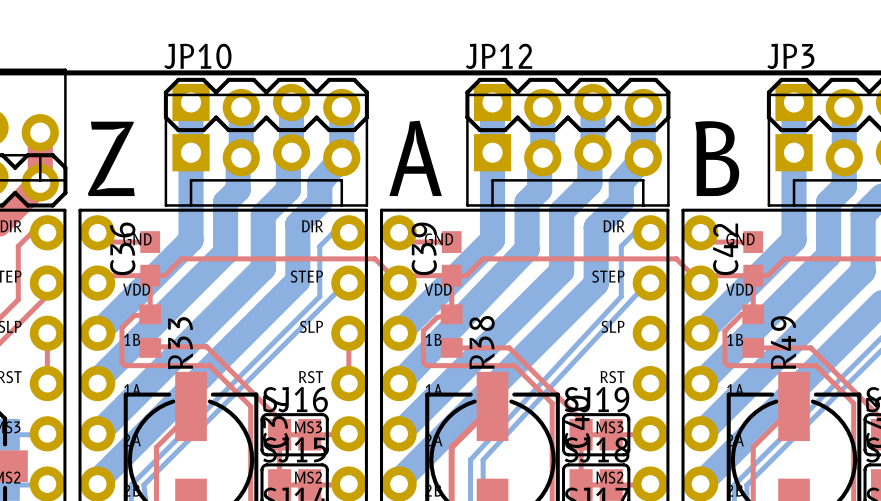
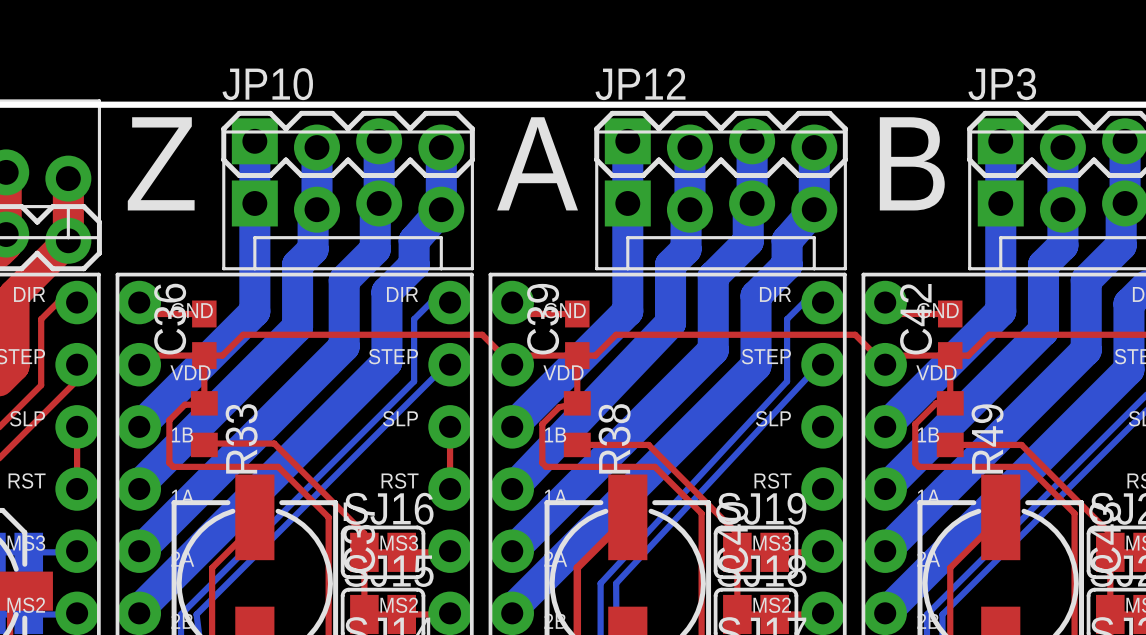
text position: Z (111, 158) -> Z (161, 163)
text position: A (415, 158) -> A (537, 163)
text position: B (717, 158) -> B (912, 163)

